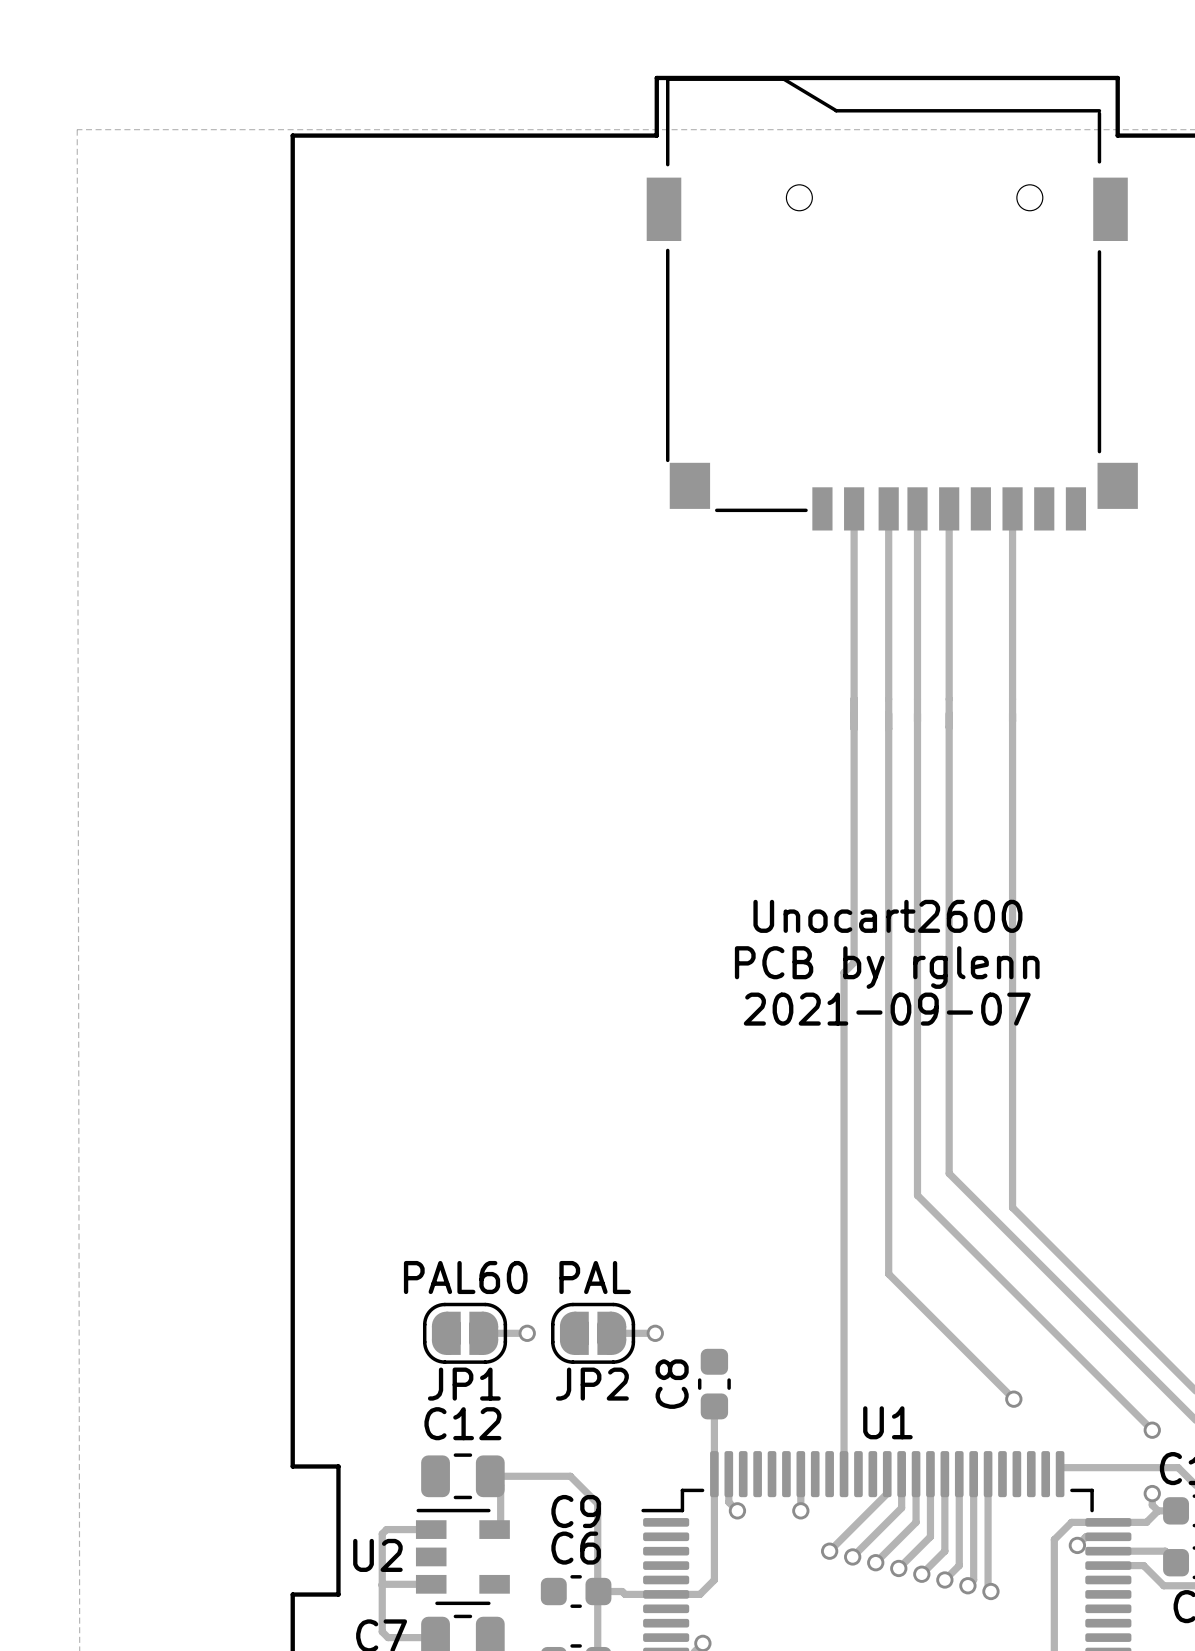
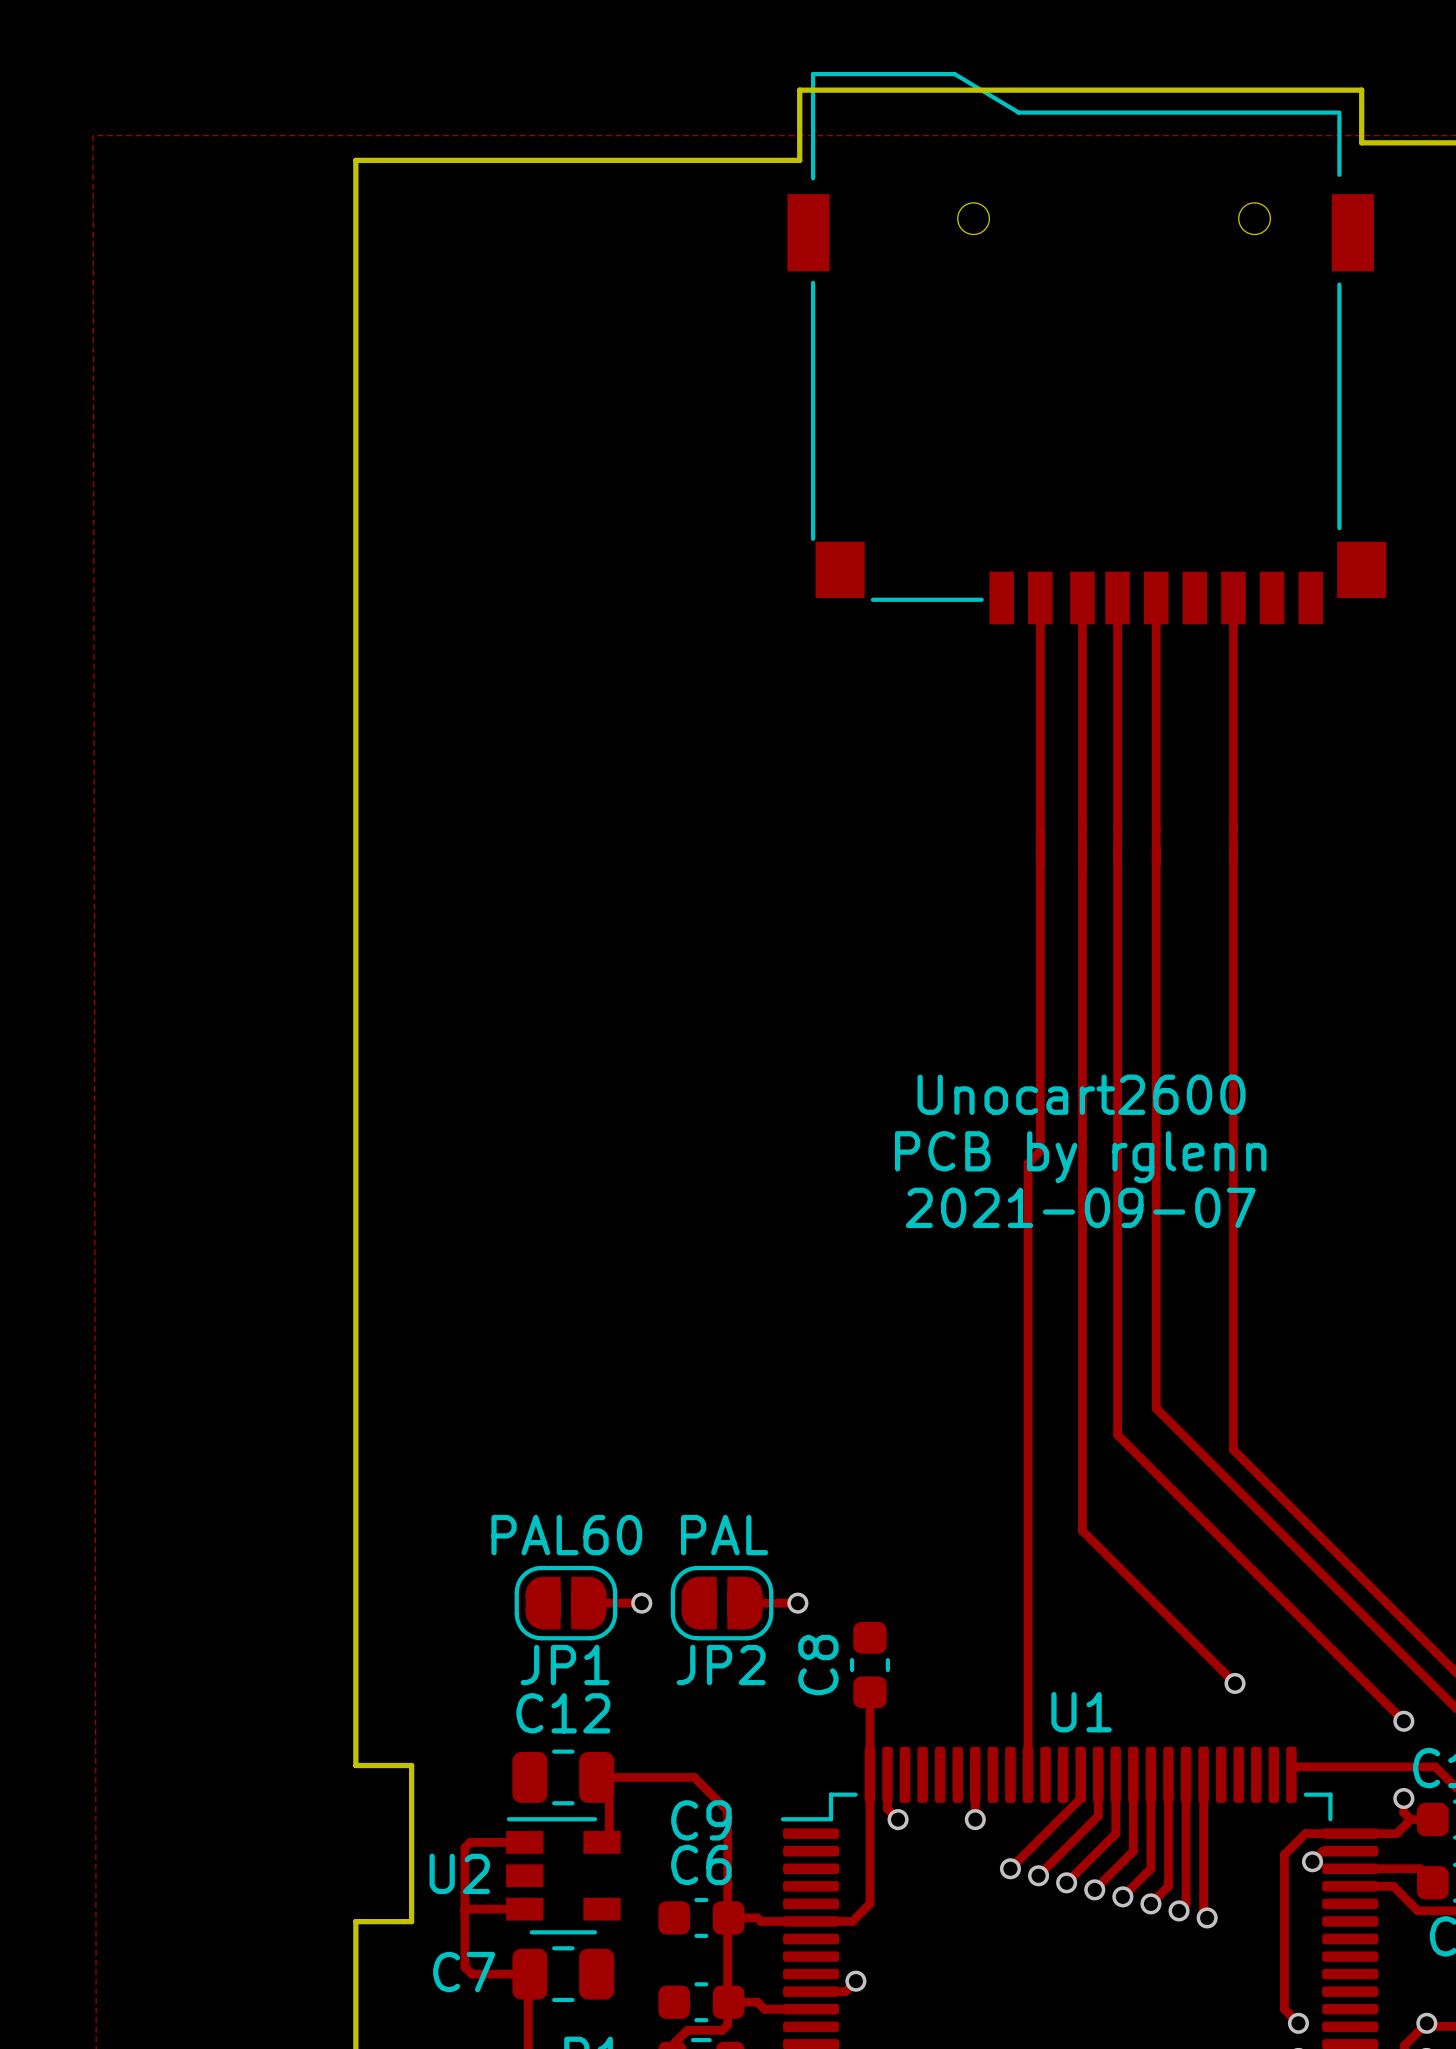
board edge: (656, 92) (656, 77) (1117, 77) (1117, 92) -> (799, 90) (1361, 90)
board edge: (656, 135) (292, 135) (292, 149) -> (799, 142) (799, 160) (355, 160)

